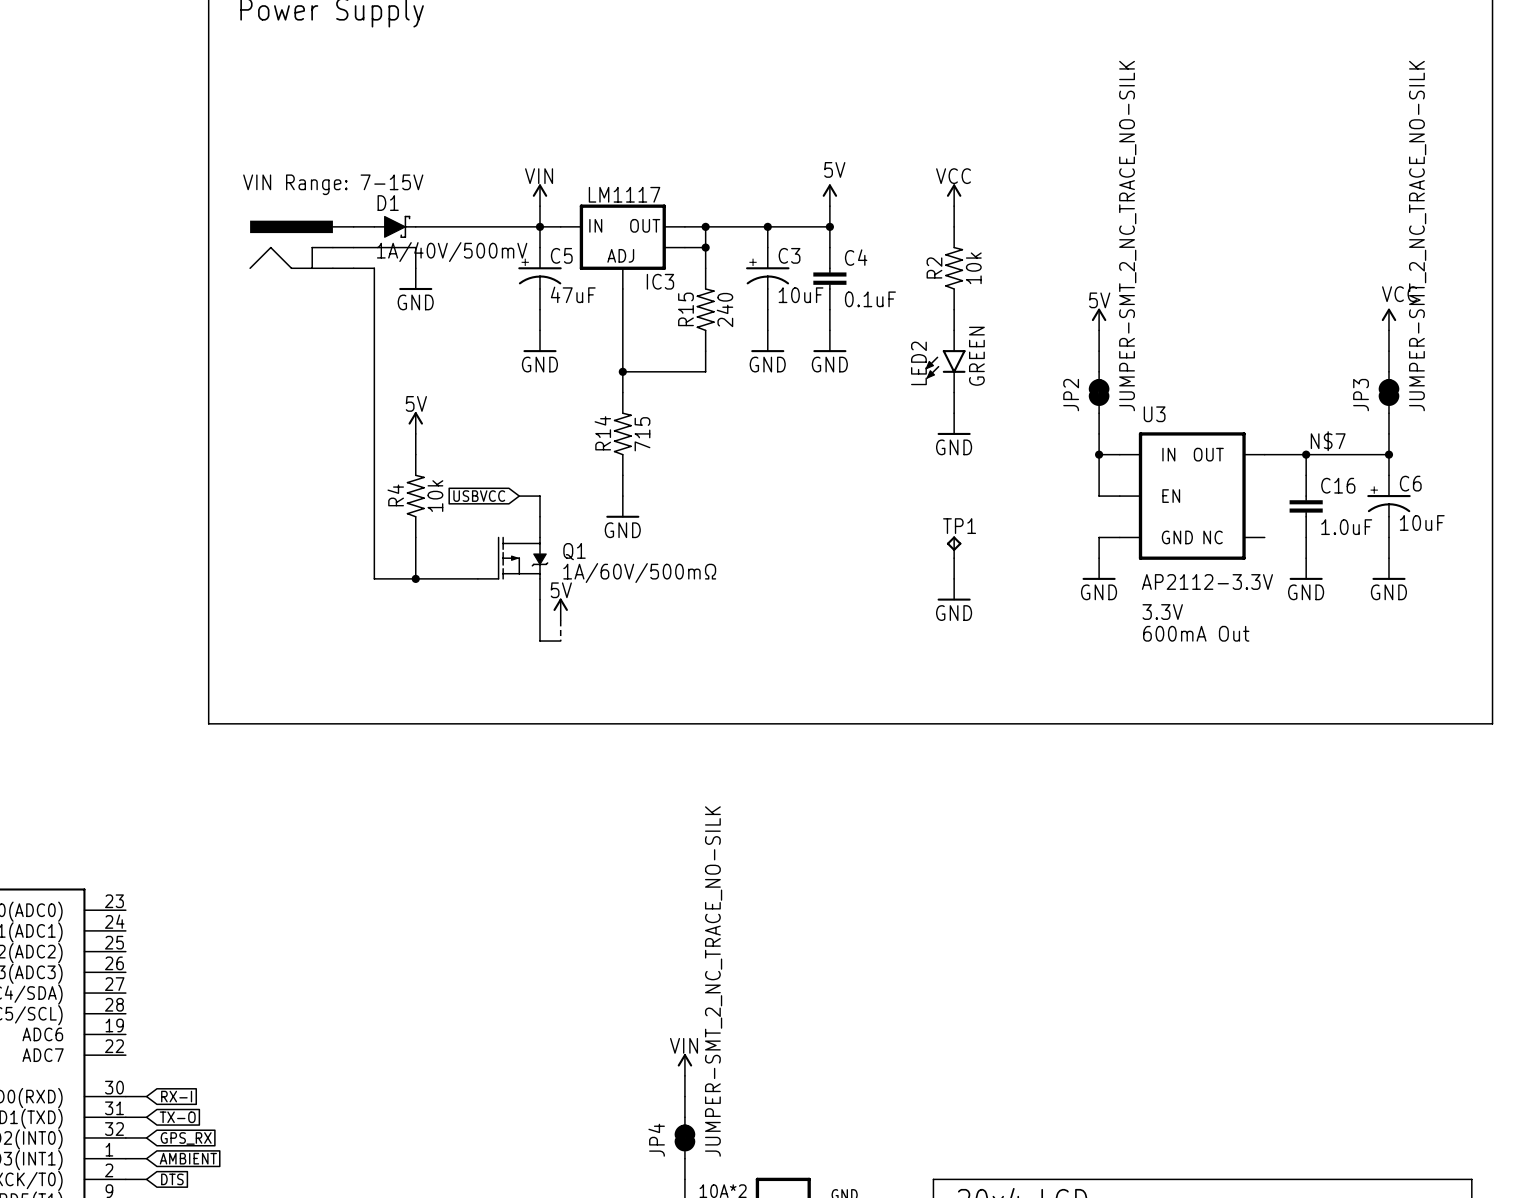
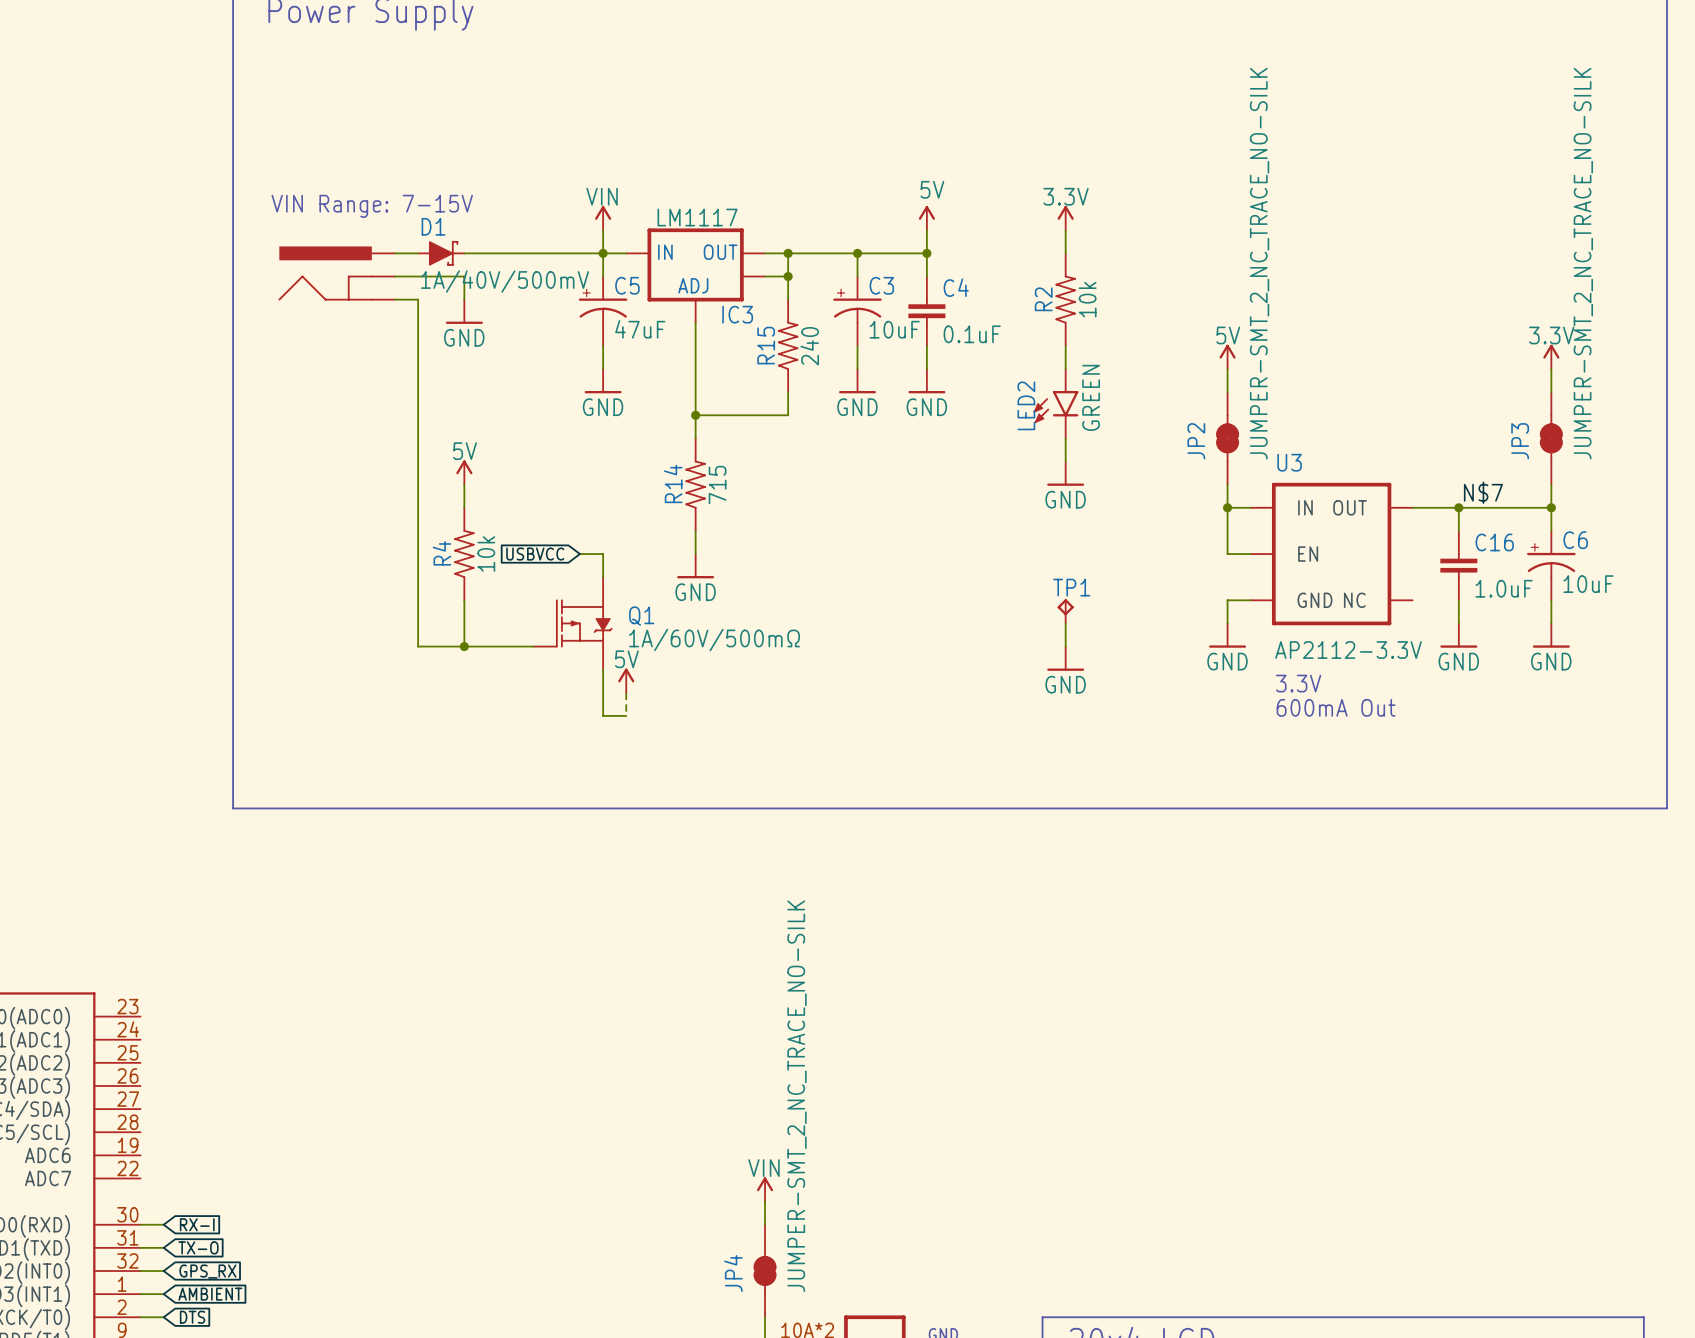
power symbol: VCC (954, 195) -> 3.3V (1065, 218)
power symbol: VCC (1388, 319) -> 3.3V (1551, 356)

